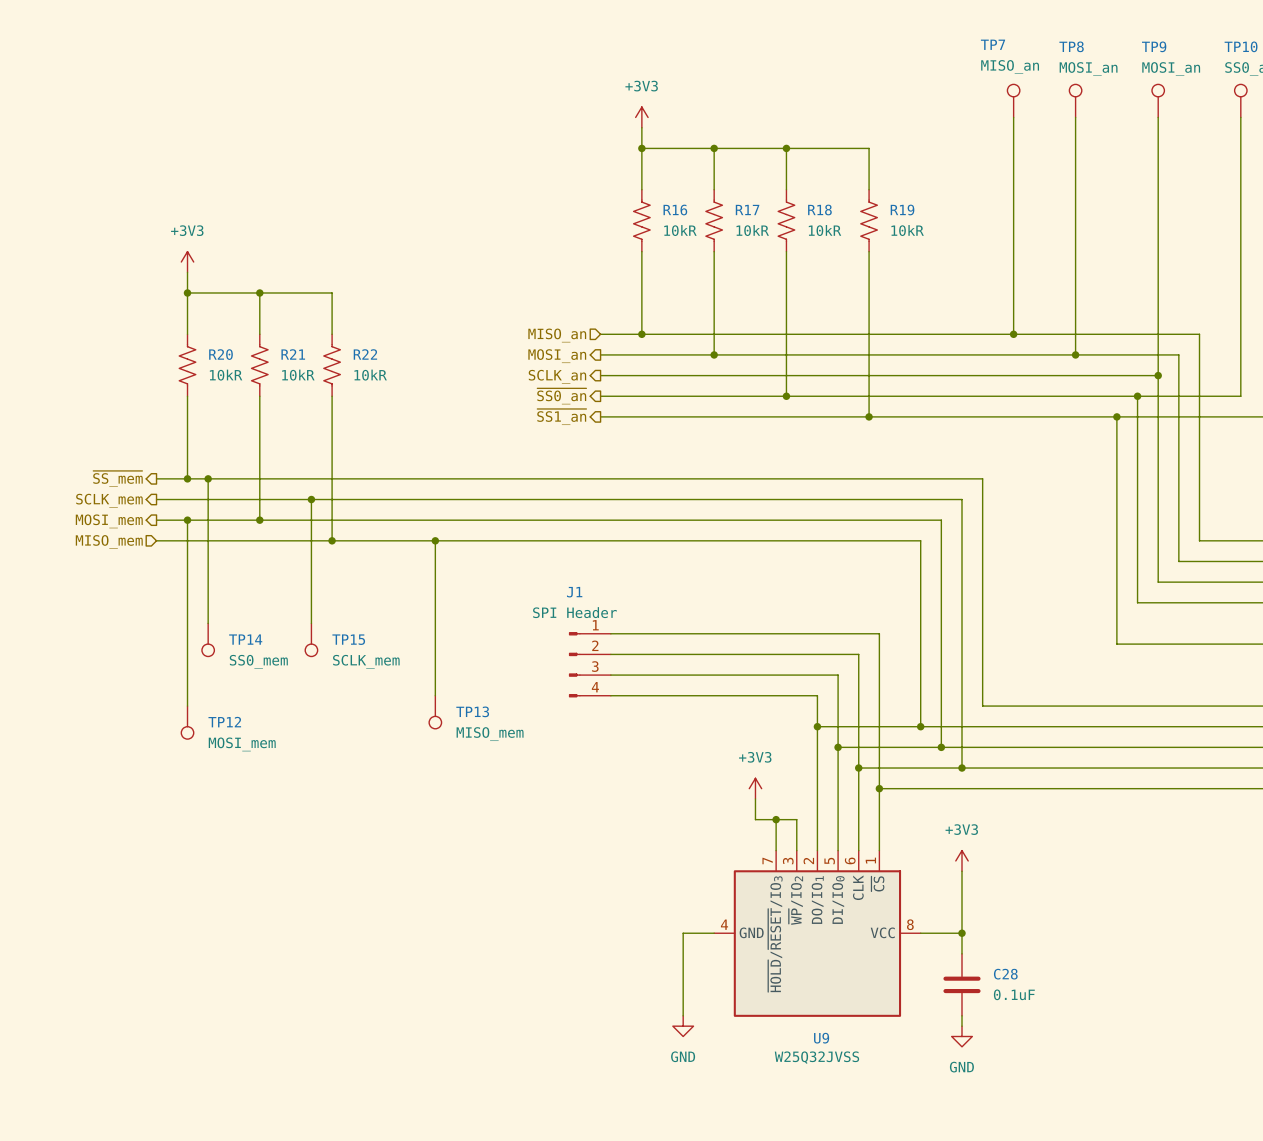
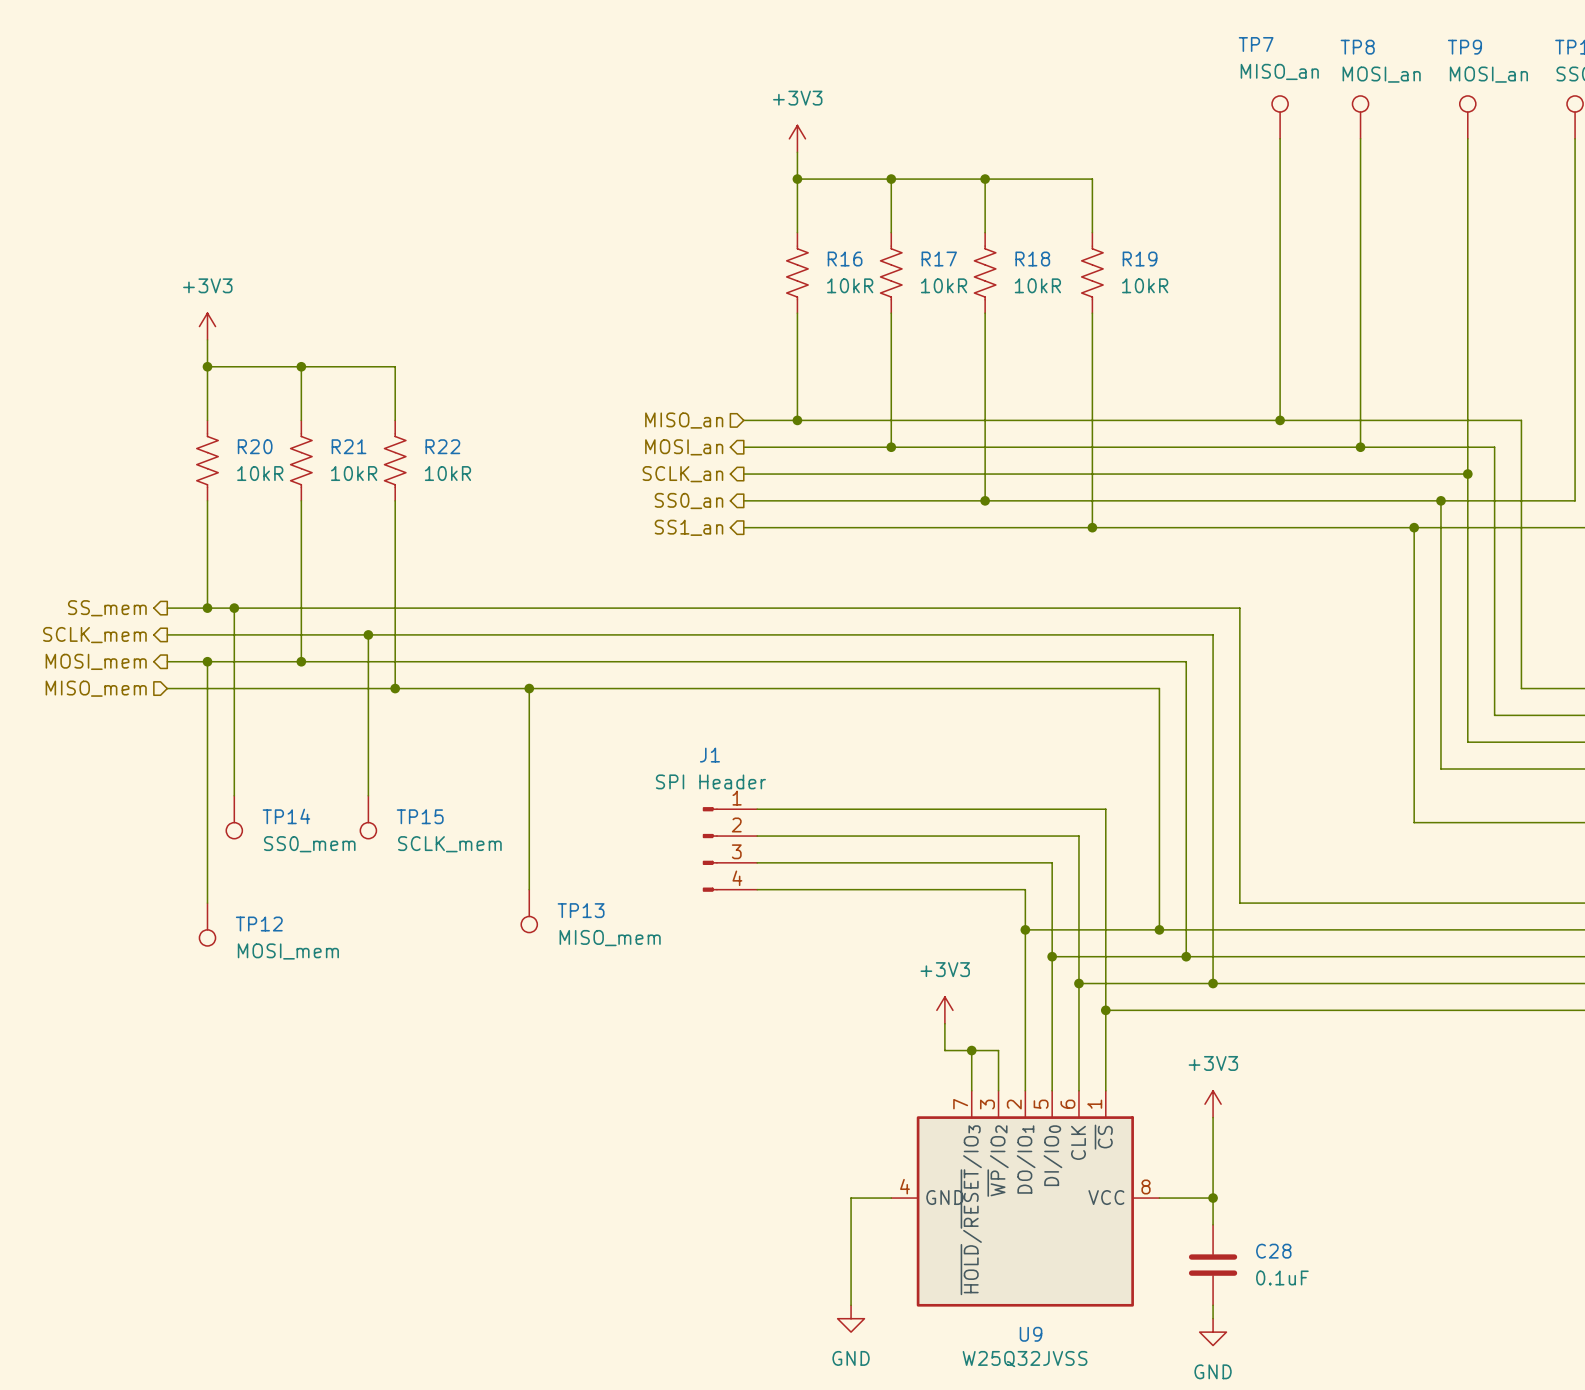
hierarchical label: ~{SS0_an} (561, 396) -> SS0_an (688, 500)
hierarchical label: ~{SS1_an} (561, 417) -> SS1_an (688, 527)
hierarchical label: ~{SS_mem} (117, 478) -> SS_mem (107, 608)

